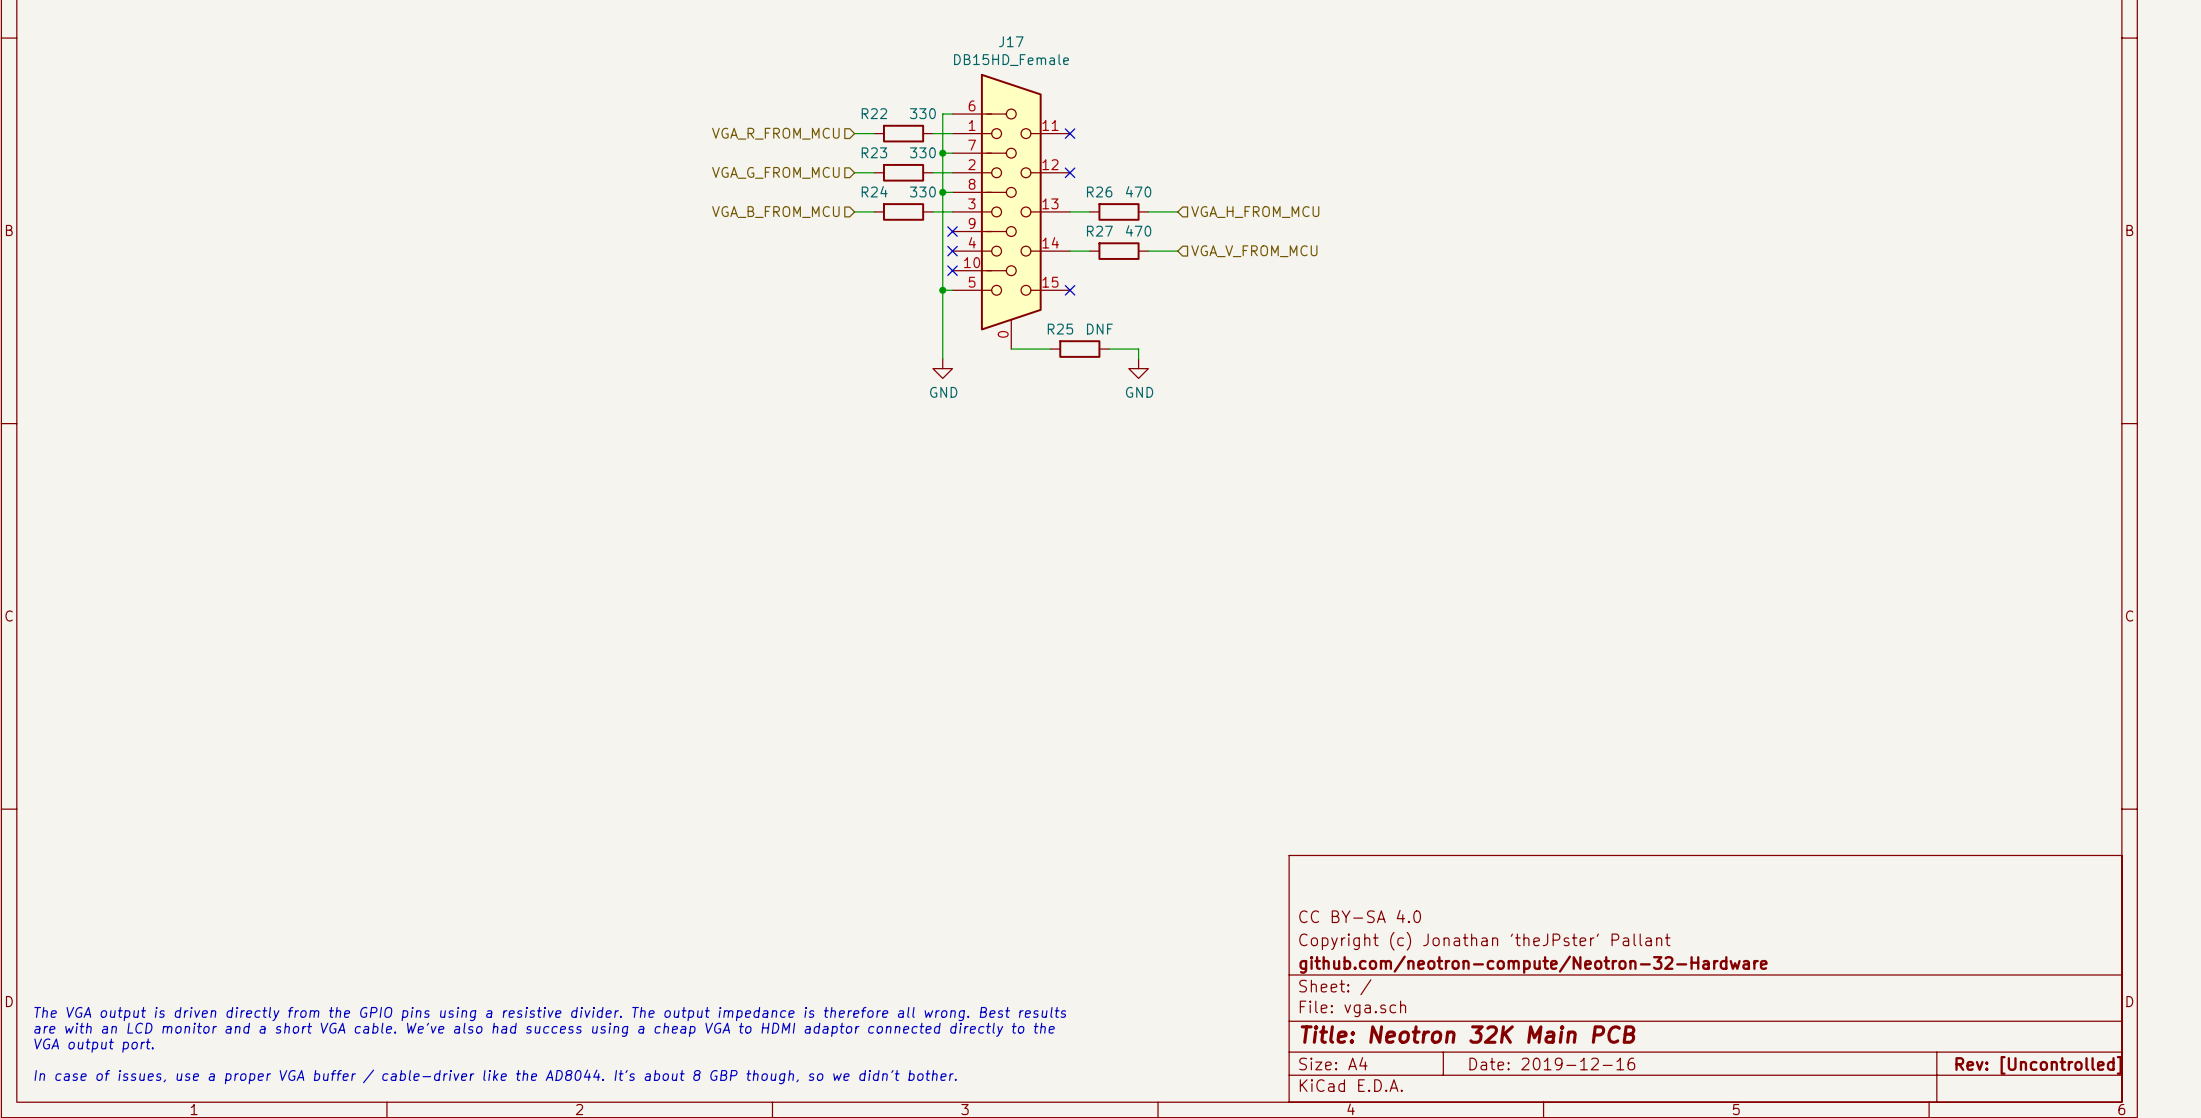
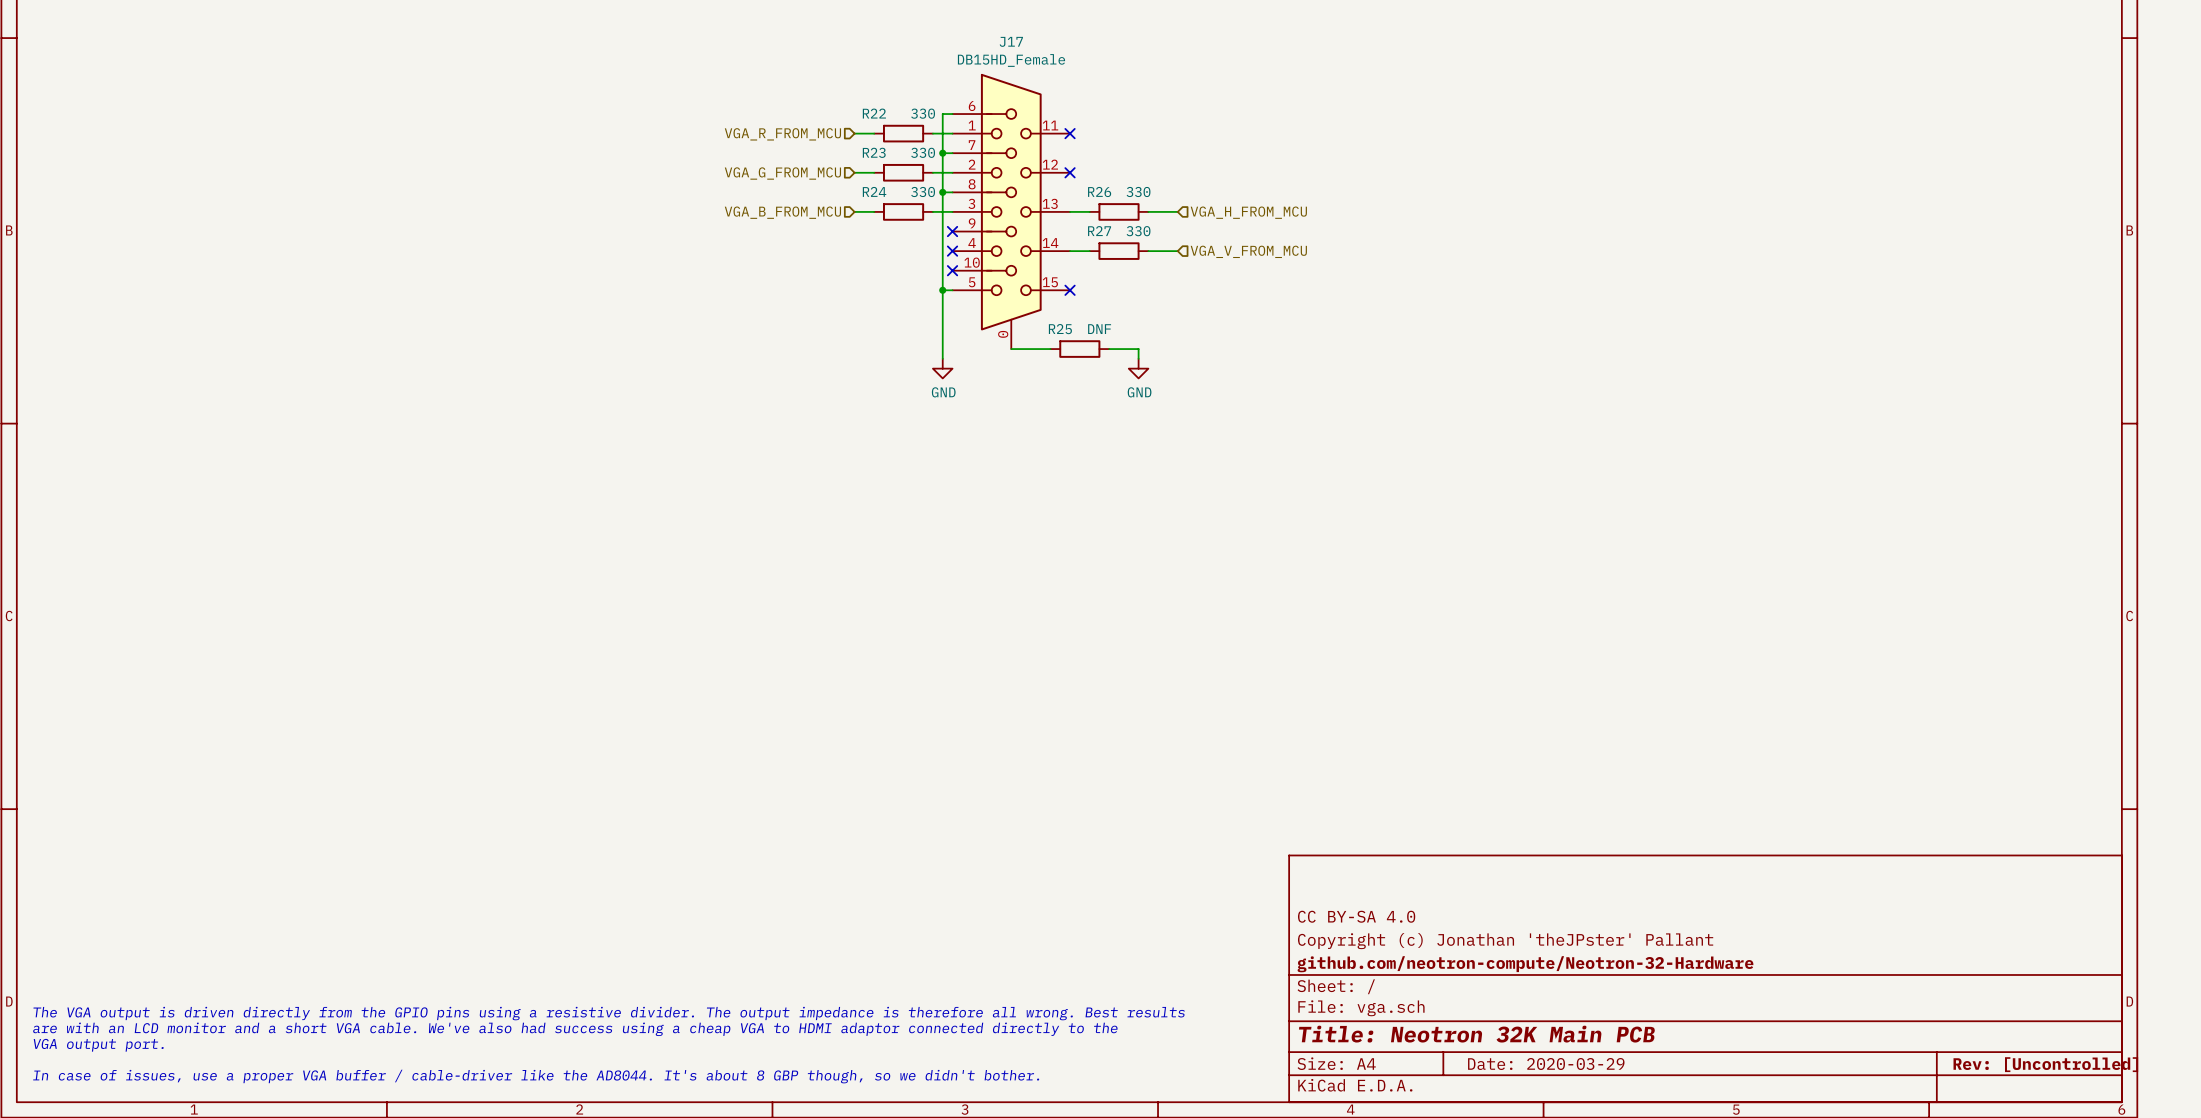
R26 value: 470 (1138, 191) -> 330 (1138, 191)
R27 value: 470 (1138, 230) -> 330 (1138, 231)
title block: Date: 2019-12-16 (1552, 1064) -> Date: 2020-03-29 (1546, 1064)

